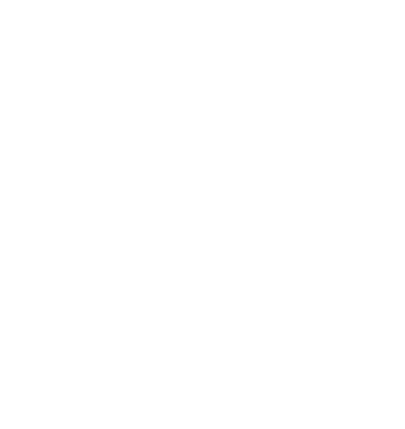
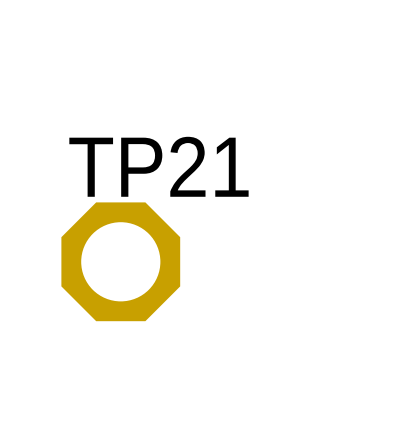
TP21: none -> (120, 261)

